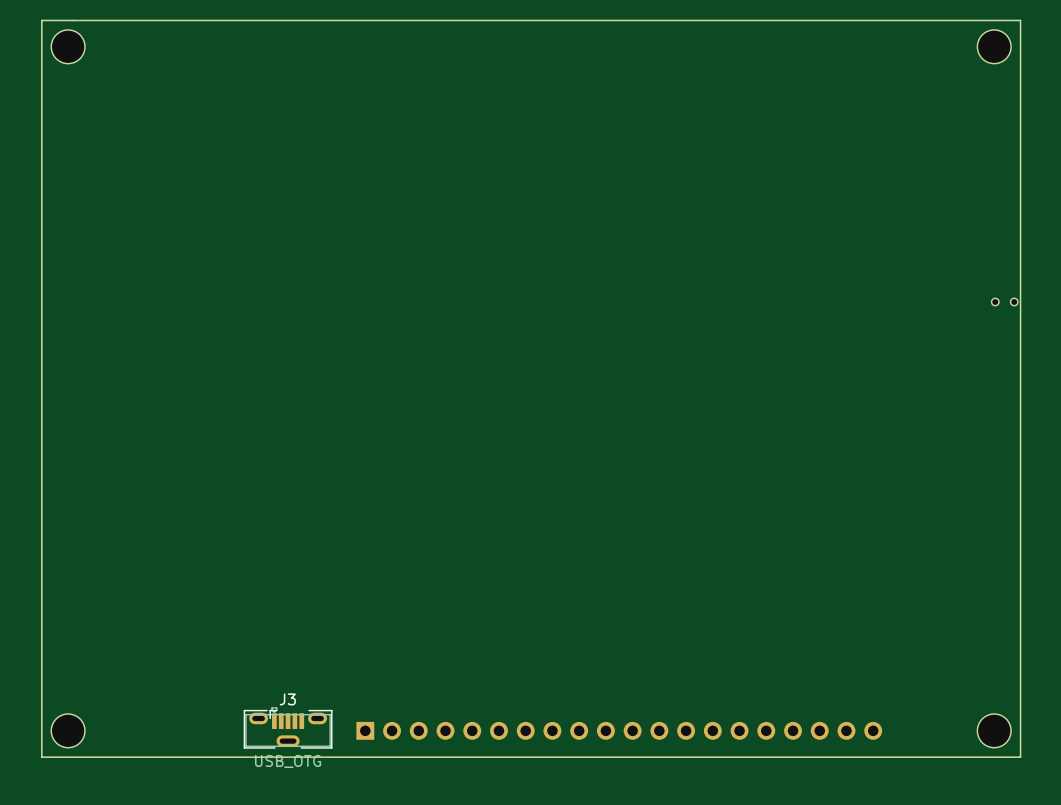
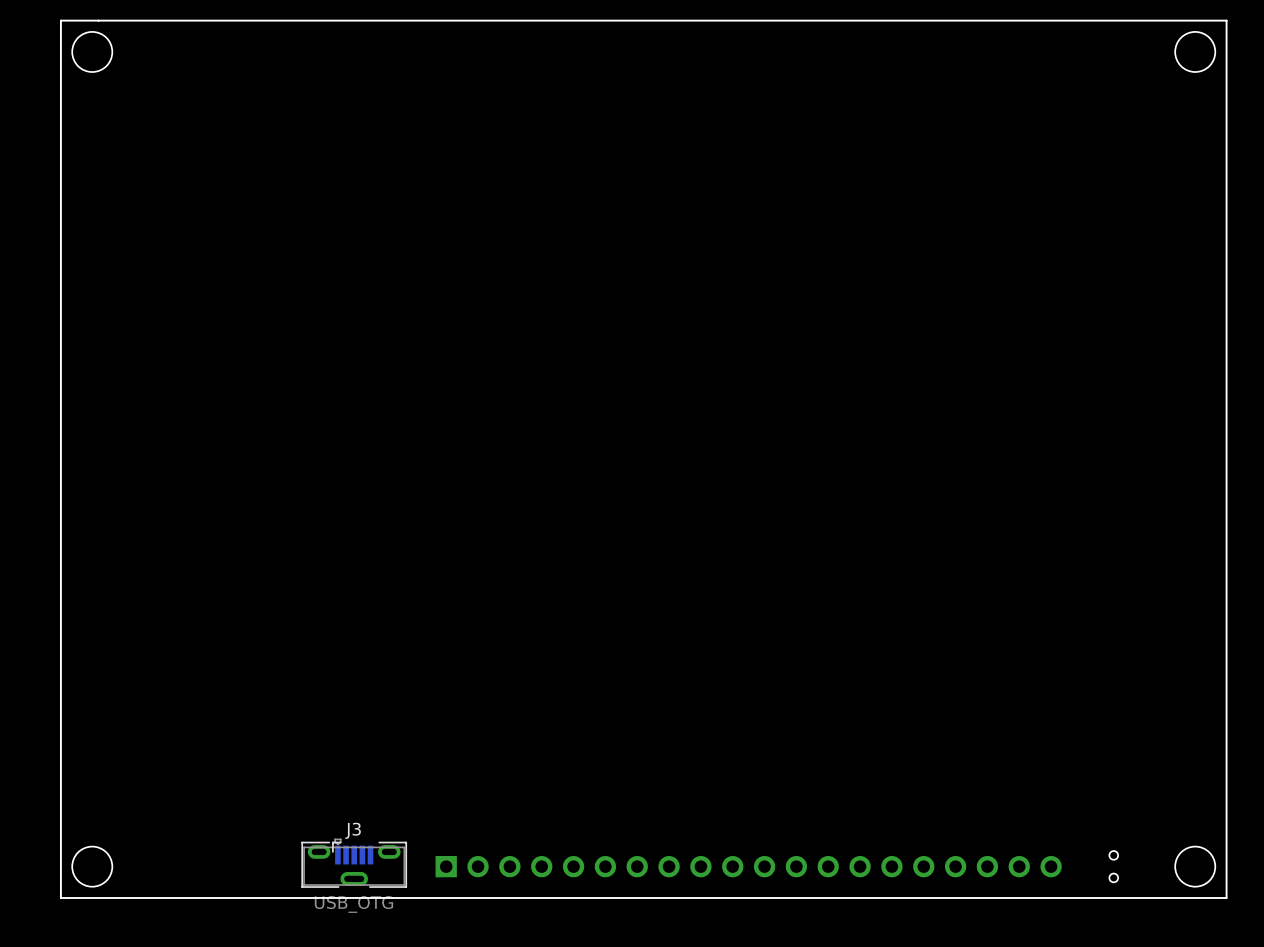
part: (1004, 302) -> none
part: none -> (1113, 866)

